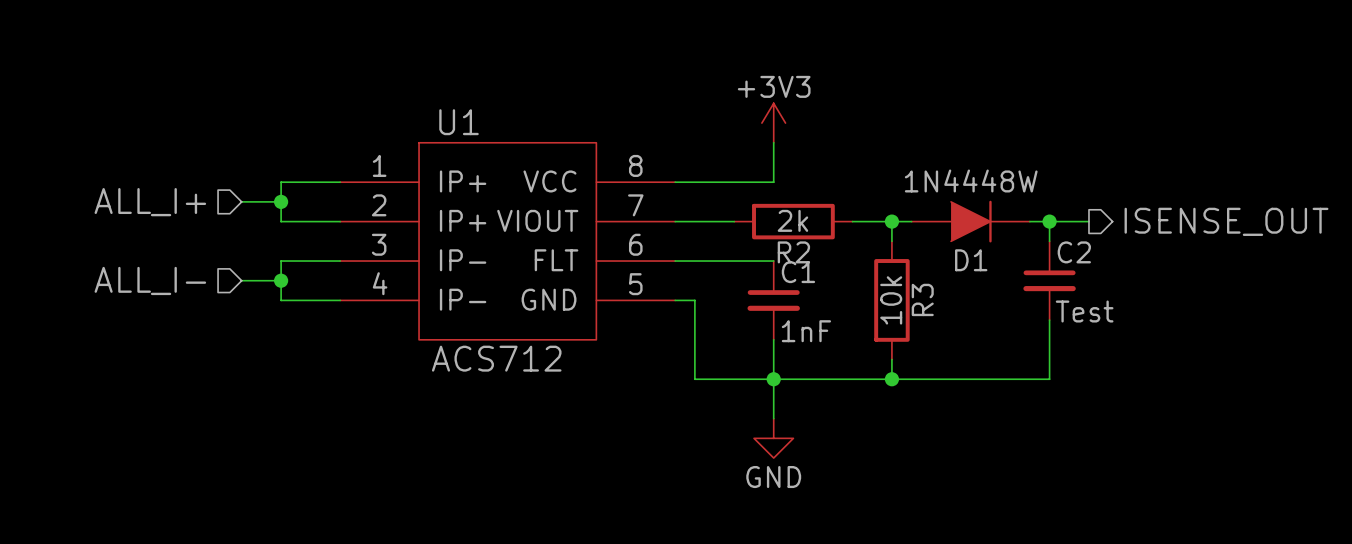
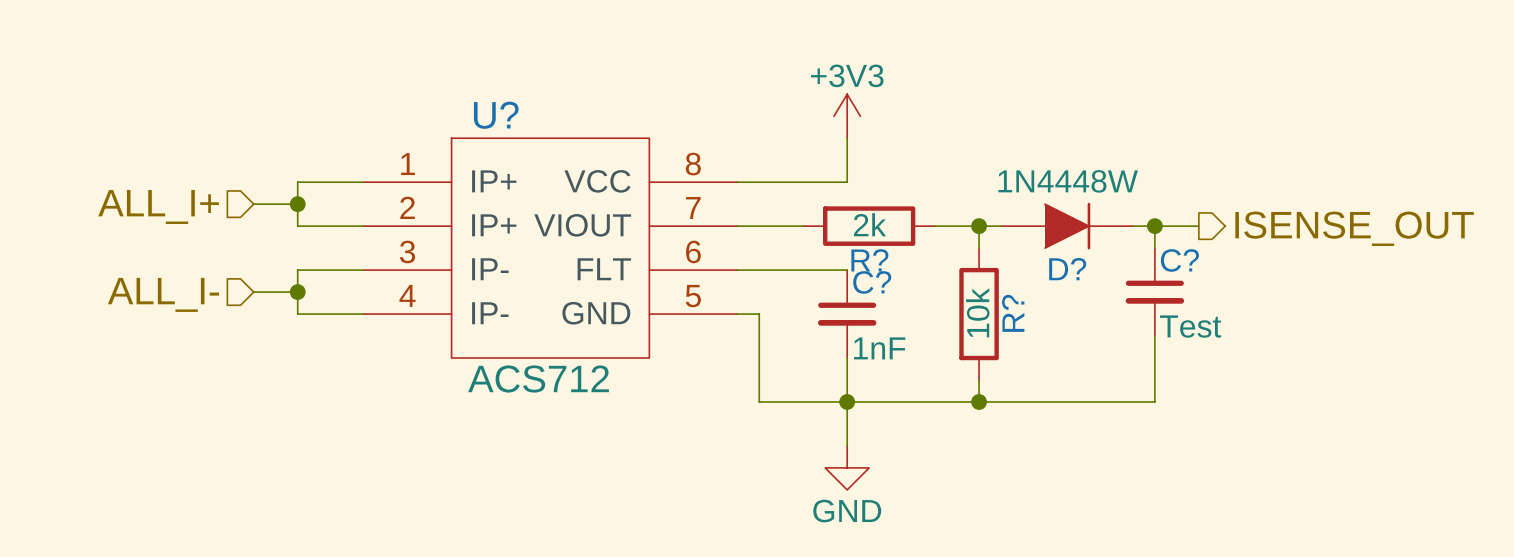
U1 name: U1 (459, 122) -> U? (496, 115)
R2 name: R2 (793, 252) -> R? (869, 260)
C2 name: C2 (1074, 252) -> C? (1179, 260)
D1 name: D1 (971, 260) -> D? (1067, 269)
C1 name: C1 (798, 272) -> C? (872, 282)
R3 name: R3 (922, 299) -> R? (1013, 313)

